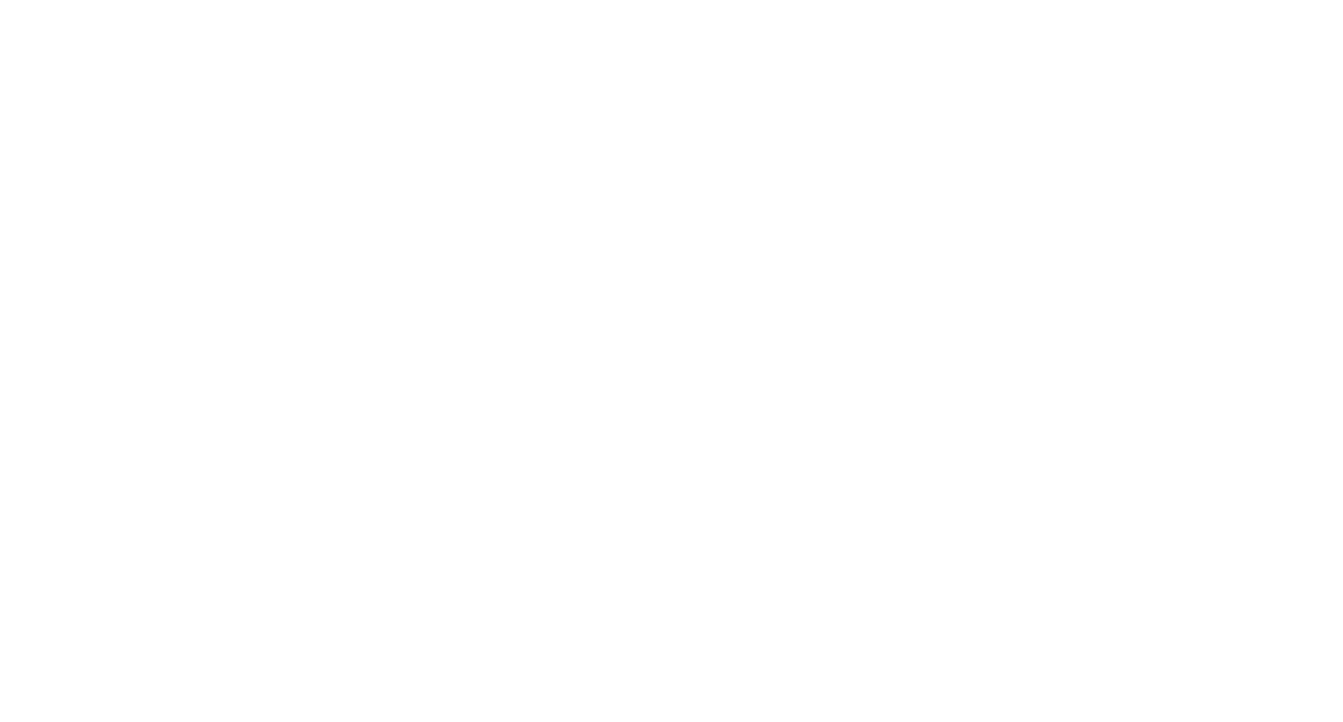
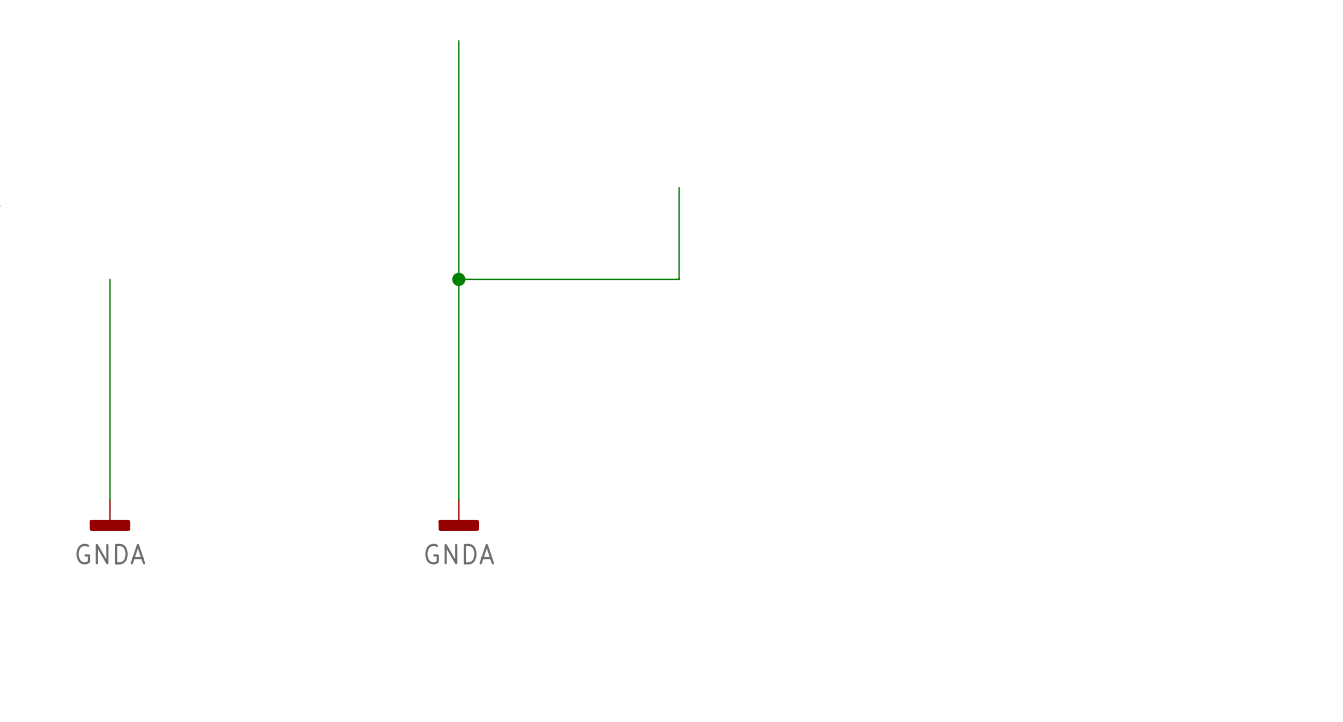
wire: none -> (458, 40) (458, 499)
wire: none -> (679, 187) (679, 279) (458, 279)
wire: none -> (109, 279) (109, 499)
junction: none -> (458, 279)
power symbol: none -> GNDA (109, 515)
power symbol: none -> GNDA (458, 515)

